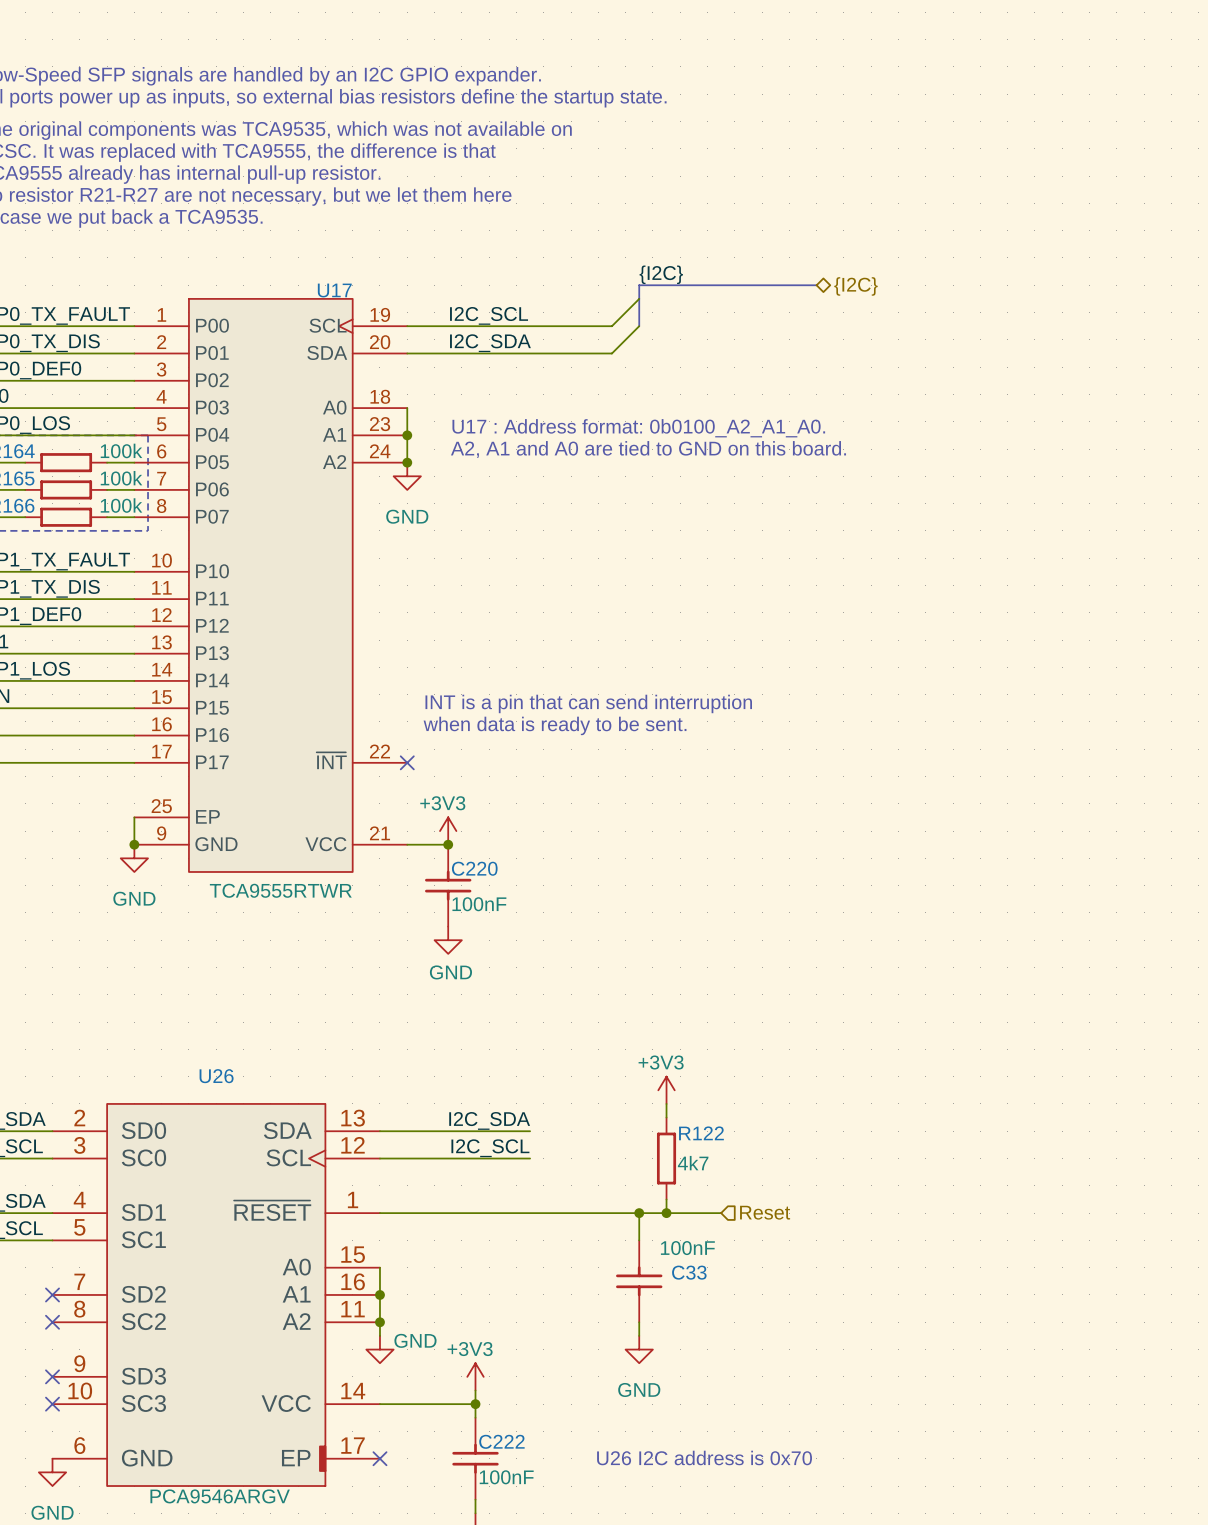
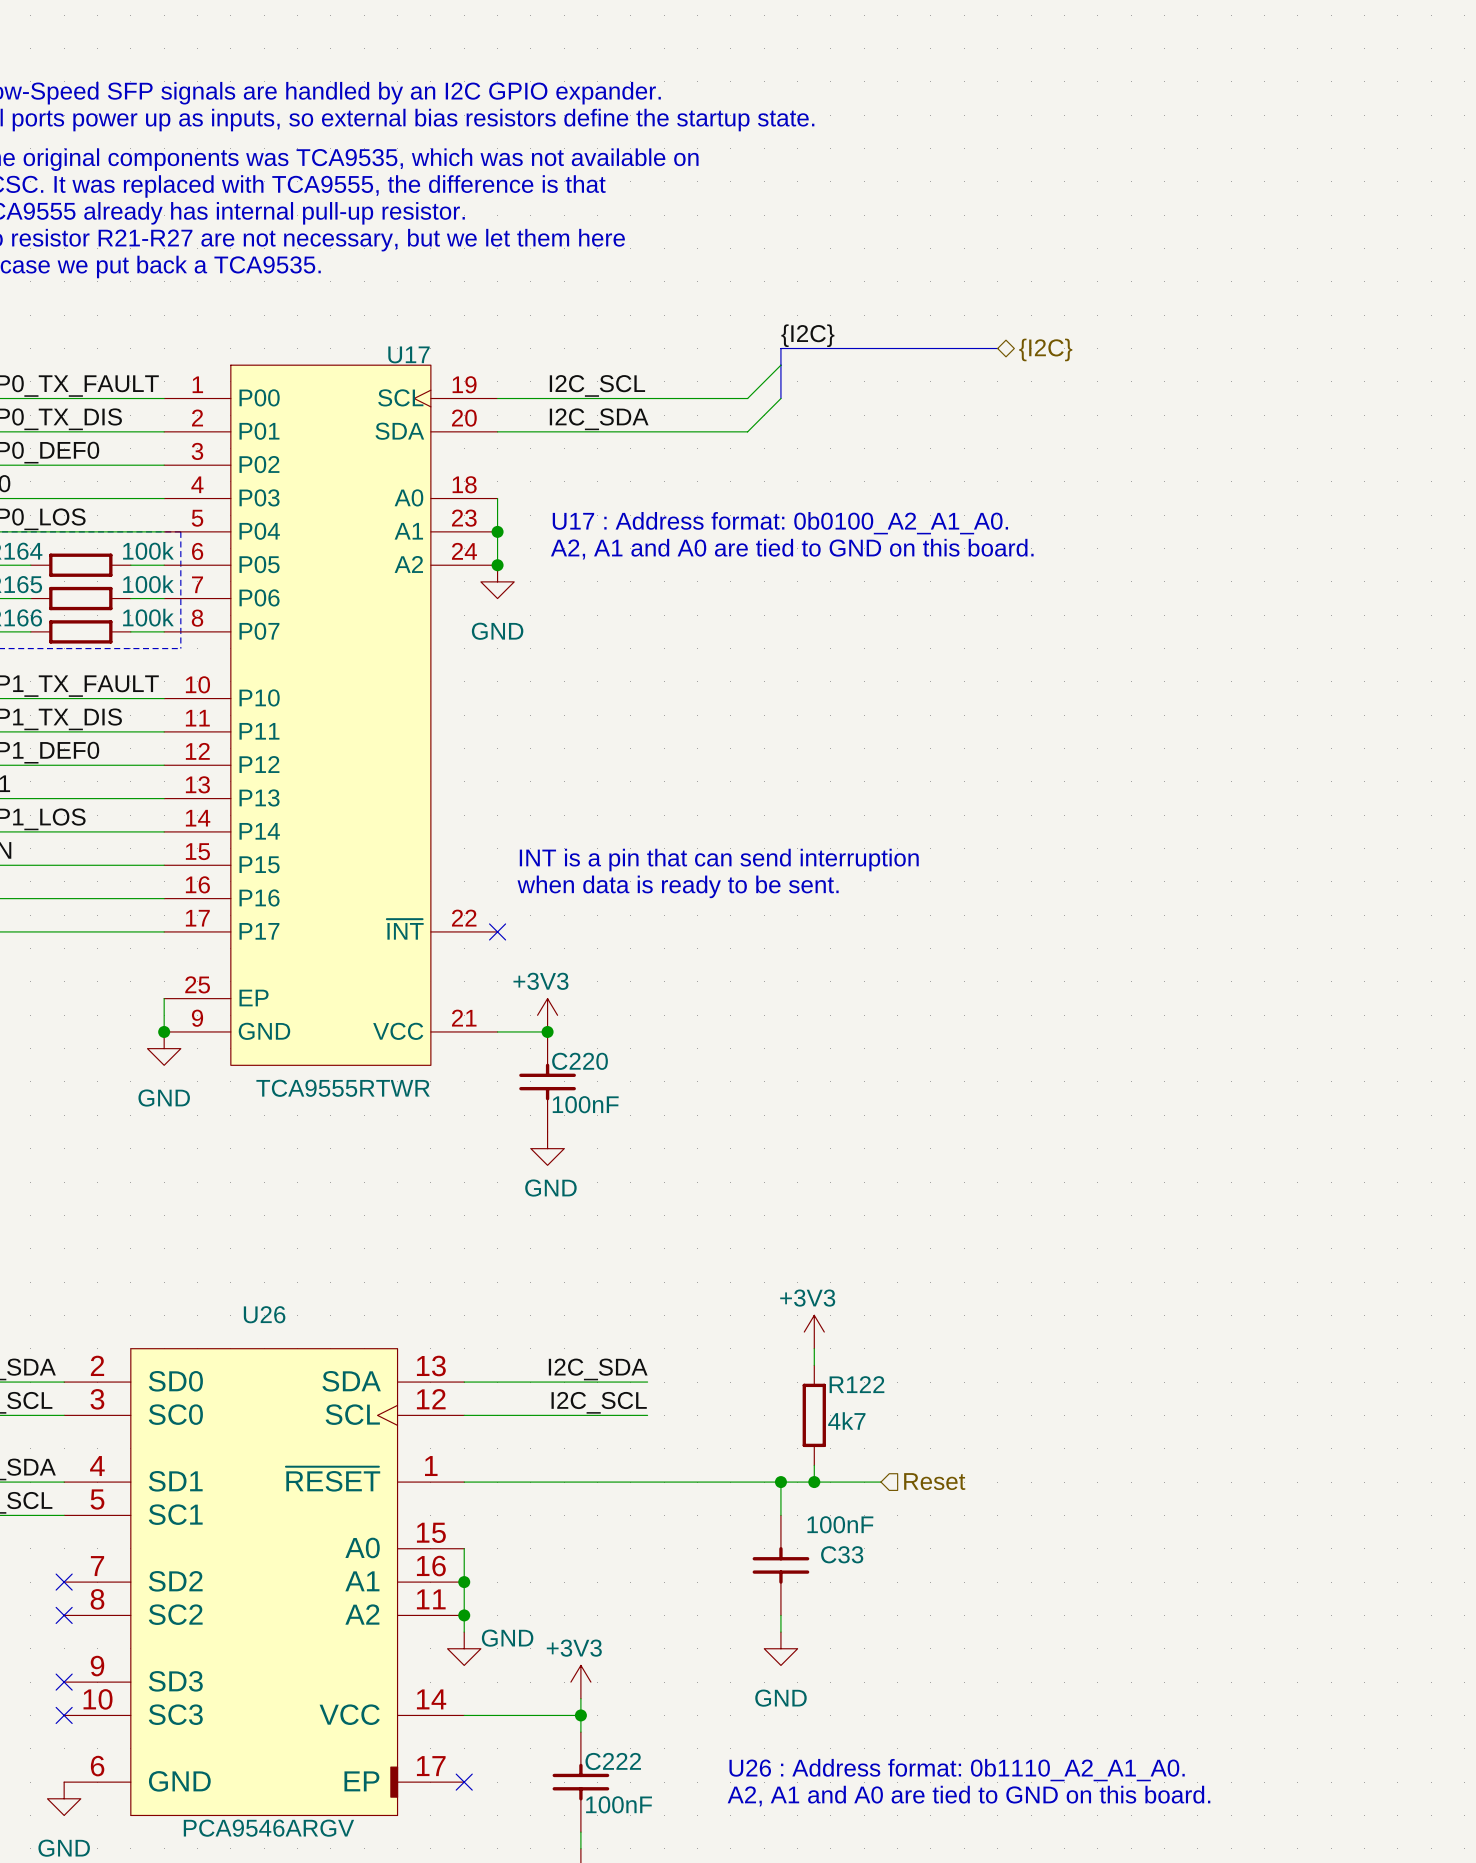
text: none -> U26 : Address format: 0b1110_A2_A1_A0. (957, 1770)
text: U26 I2C address is 0x70 (704, 1457) -> none
text: none -> A2, A1 and A0 are tied to GND on this board. (968, 1796)

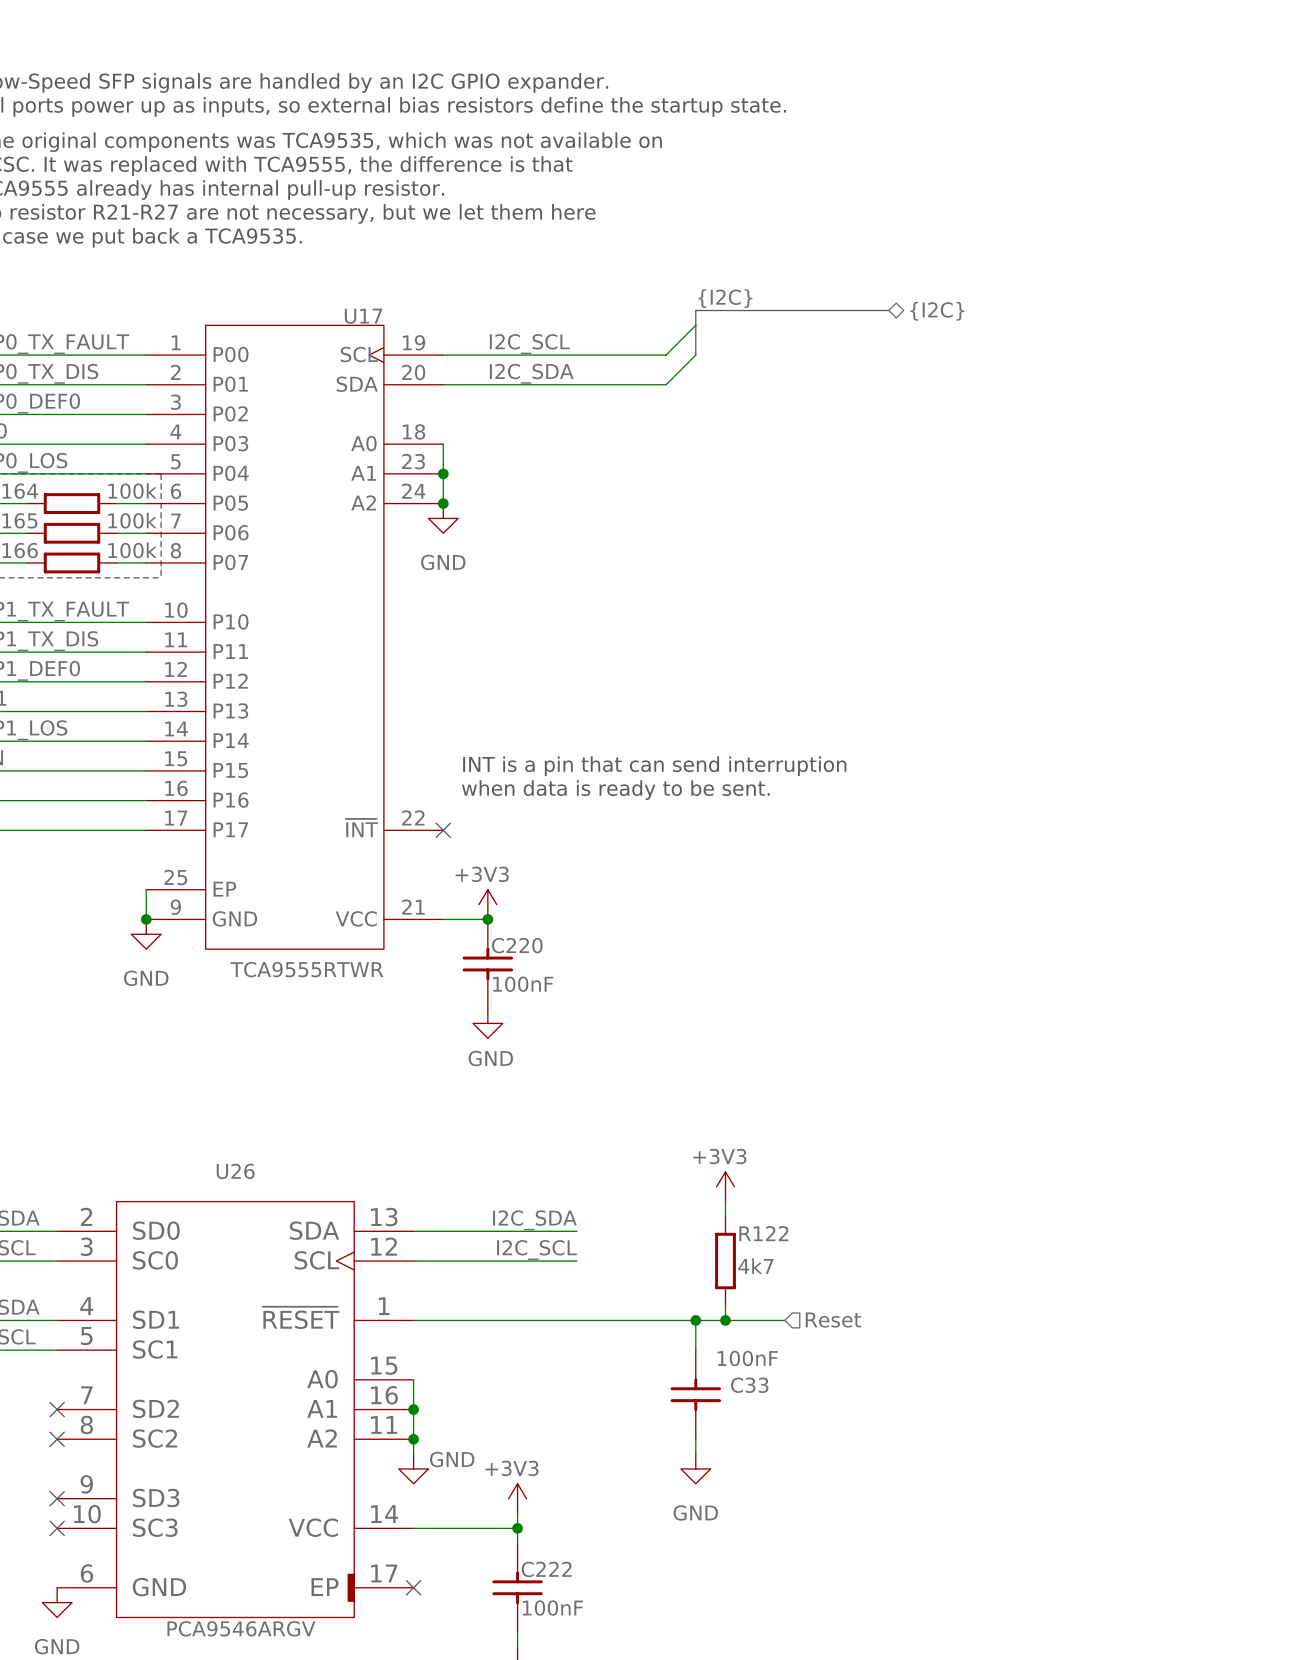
text: U17 : Address format: 0b0100_A2_A1_A0. (780, 523) -> none
text: A2, A1 and A0 are tied to GND on this board. (792, 549) -> none
text: U26 : Address format: 0b1110_A2_A1_A0. (957, 1770) -> none
text: A2, A1 and A0 are tied to GND on this board. (968, 1796) -> none

